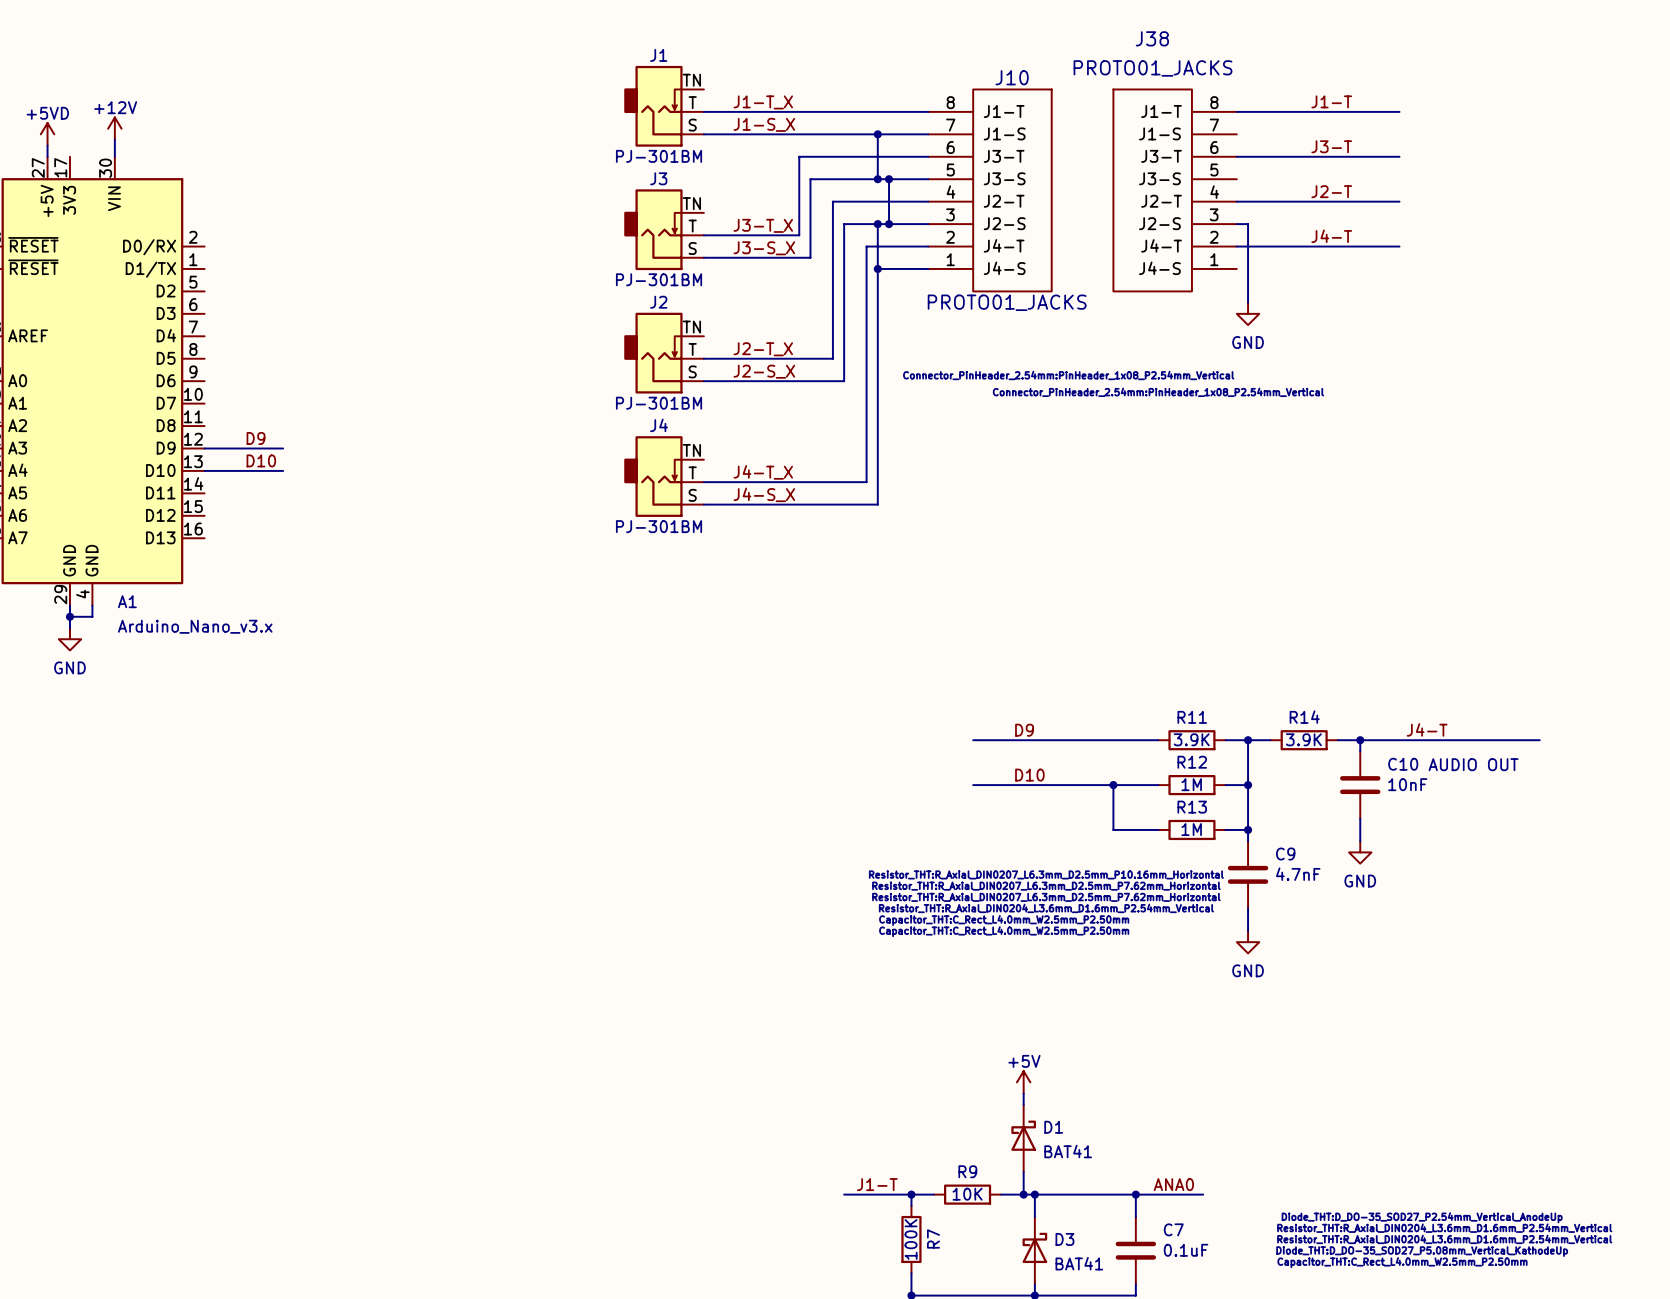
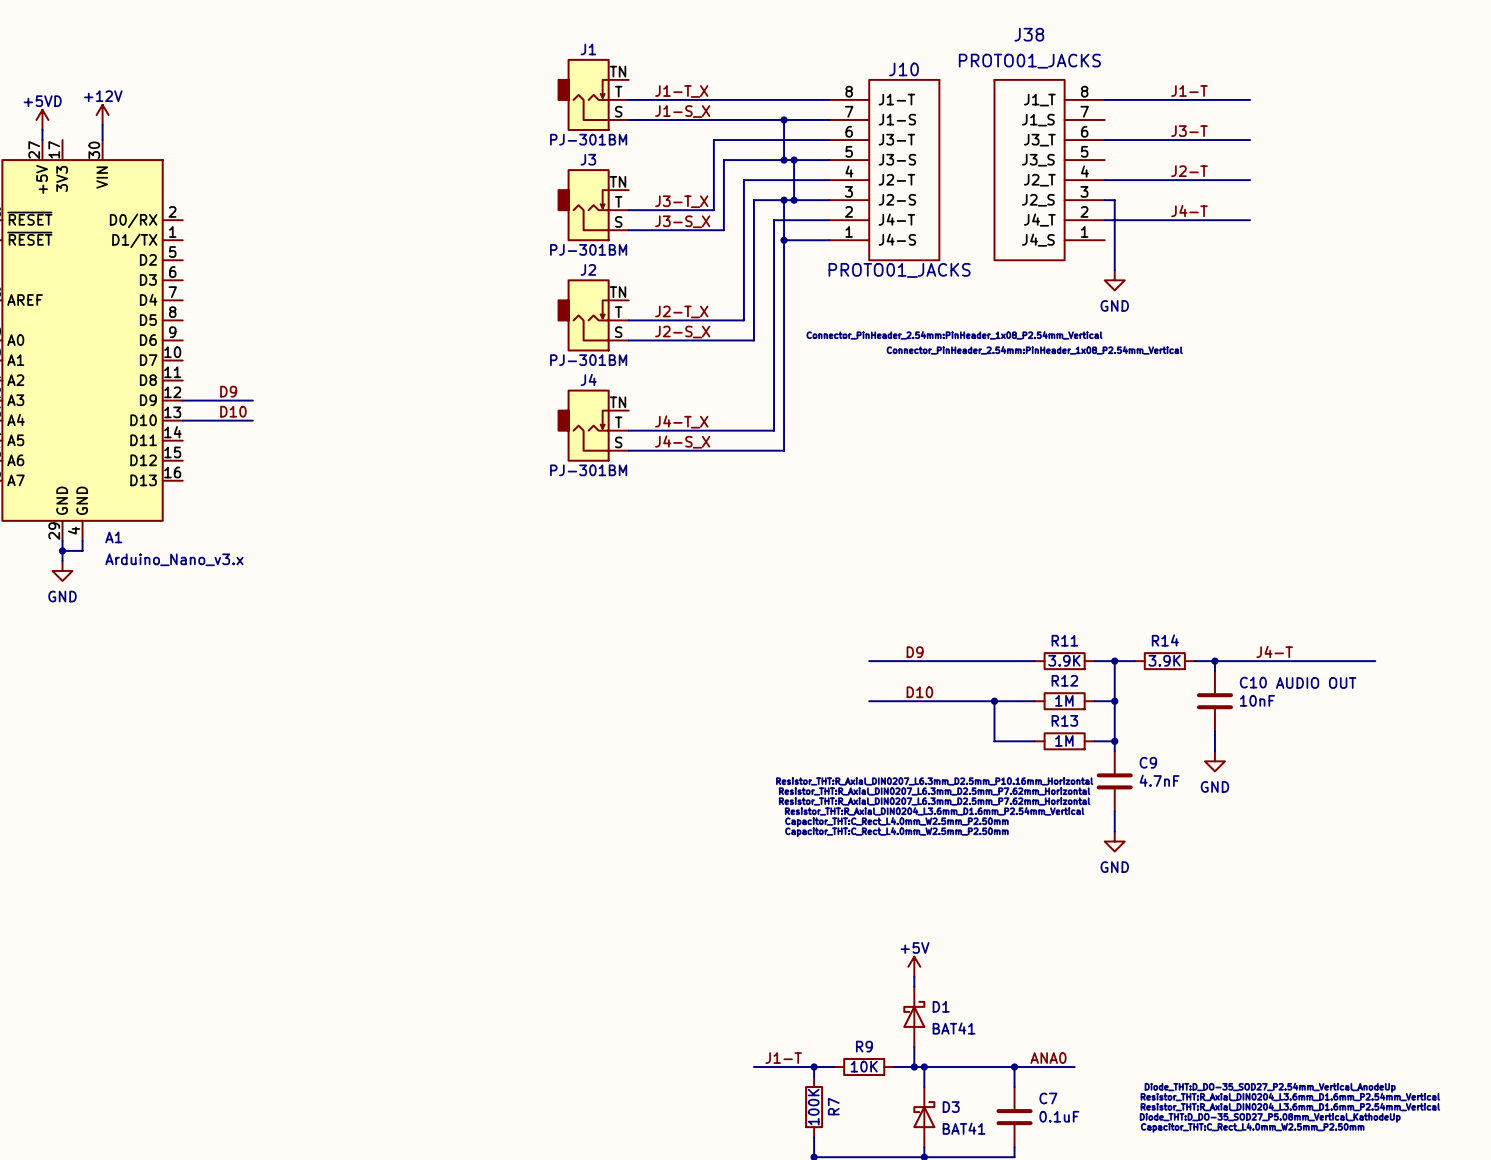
J38 pin name: J1-T (1161, 111) -> J1_T (1039, 100)
J38 pin name: J1-S (1159, 133) -> J1_S (1038, 120)
J38 pin name: J3-T (1161, 156) -> J3_T (1039, 140)
J38 pin name: J3-S (1159, 178) -> J3_S (1038, 160)
J38 pin name: J2-T (1161, 201) -> J2_T (1039, 180)
J38 pin name: J2-S (1159, 223) -> J2_S (1038, 200)
J38 pin name: J4-T (1161, 245) -> J4_T (1039, 220)
J38 pin name: J4-S (1159, 268) -> J4_S (1038, 240)

